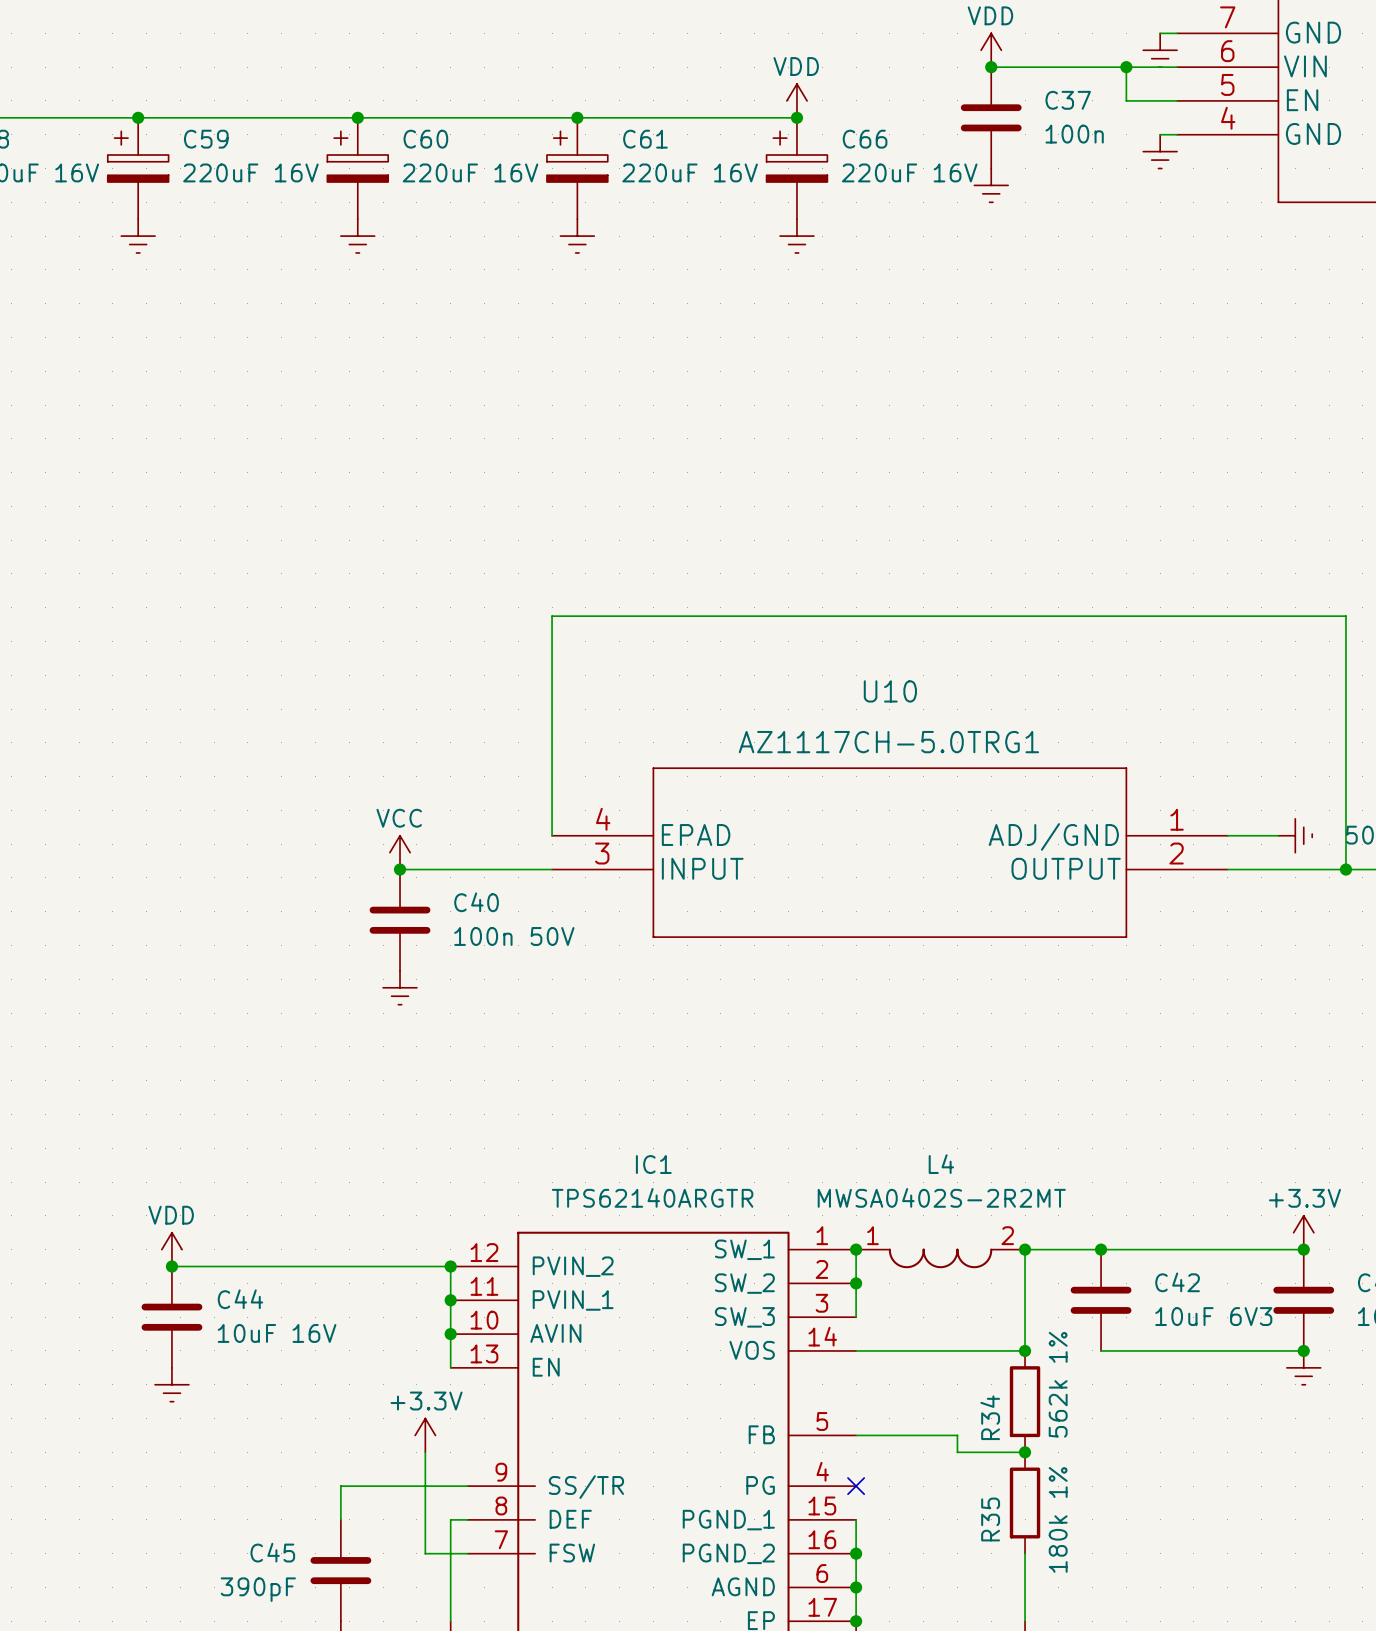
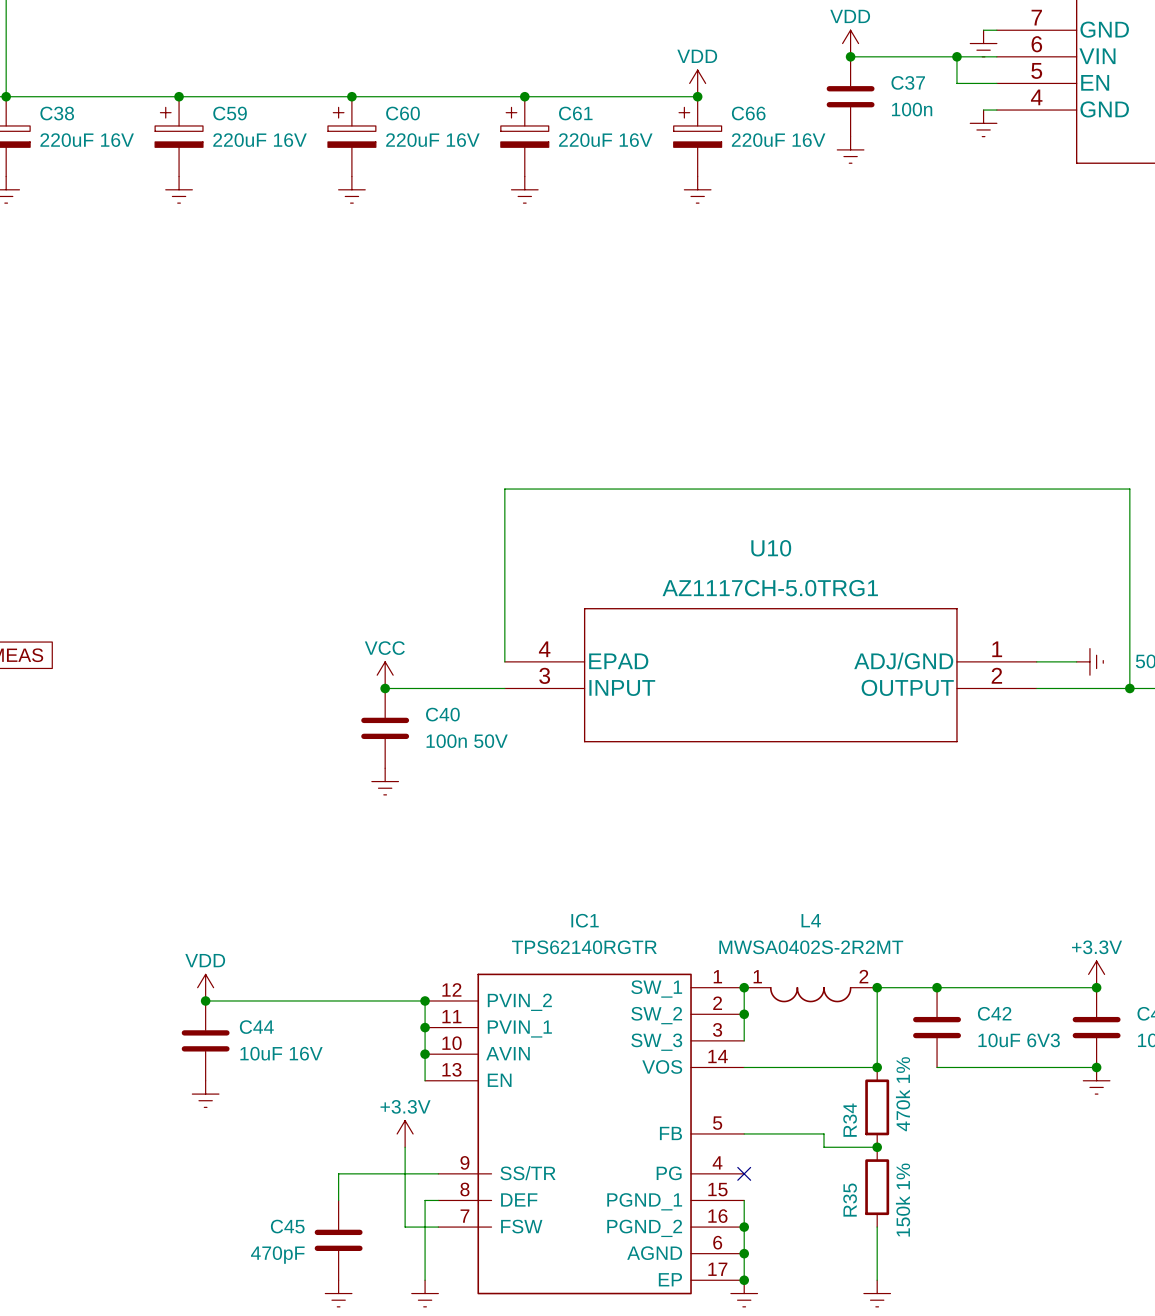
IC1 value: TPS62140ARGTR (652, 1197) -> TPS62140RGTR (584, 947)
R34 value: 562k 1% (1058, 1384) -> 470k 1% (903, 1094)
R35 value: 180k 1% (1058, 1519) -> 150k 1% (903, 1200)
C45 value: 390pF (258, 1589) -> 470pF (277, 1255)

